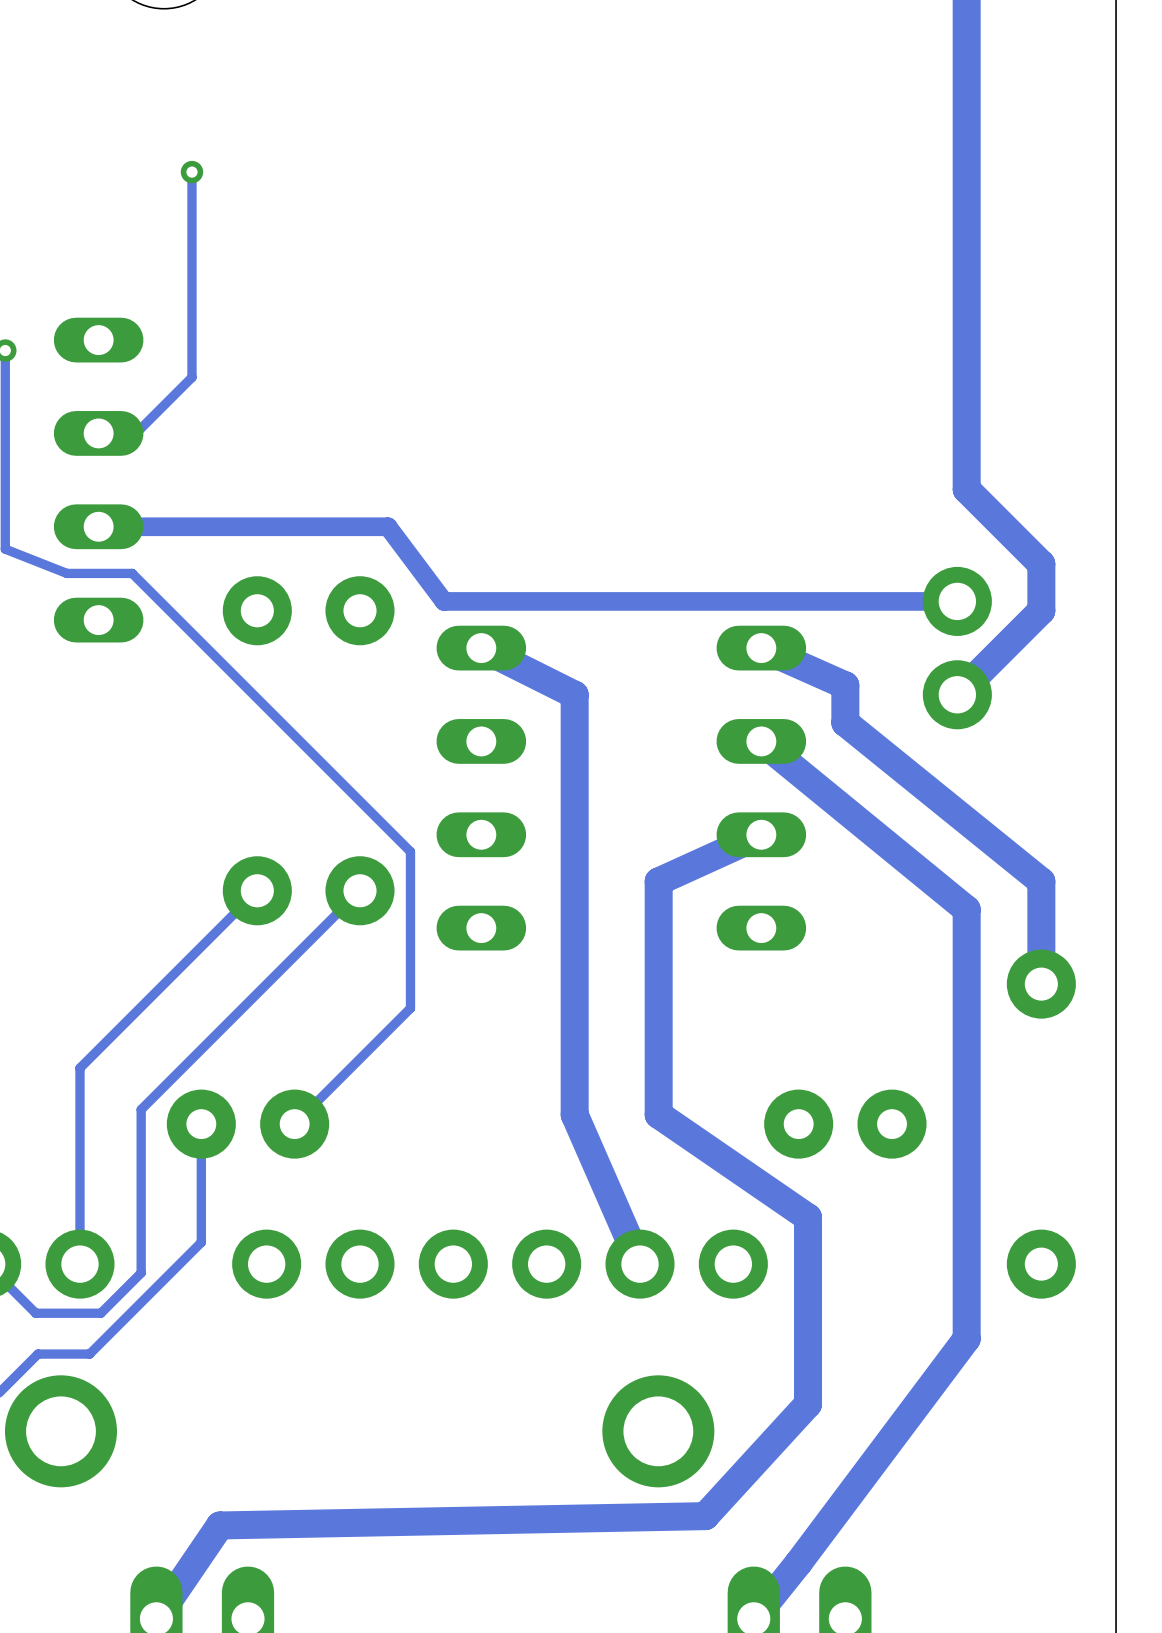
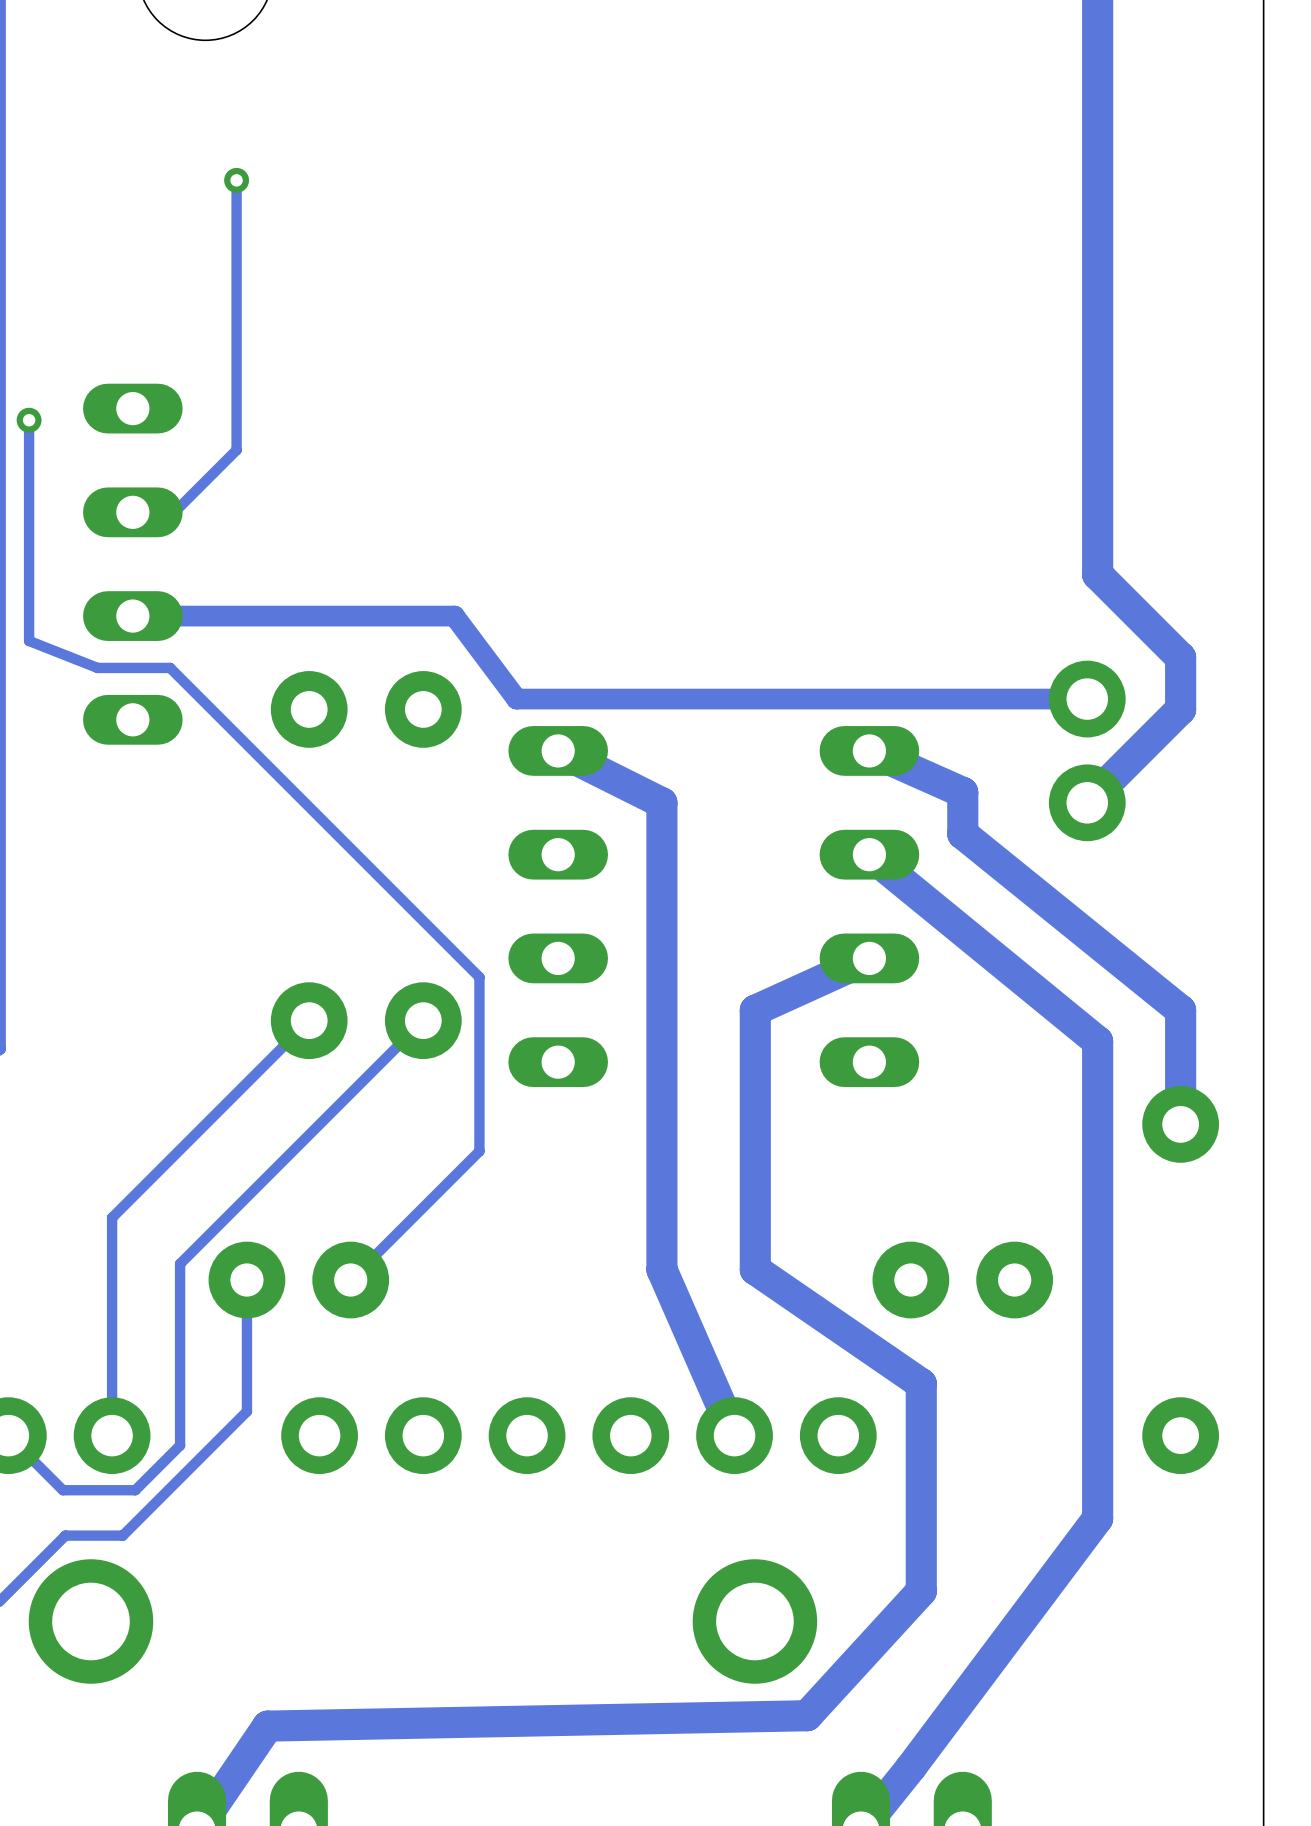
track: none -> (236, 180) (236, 221)
via position: (191, 172) -> (236, 180)

